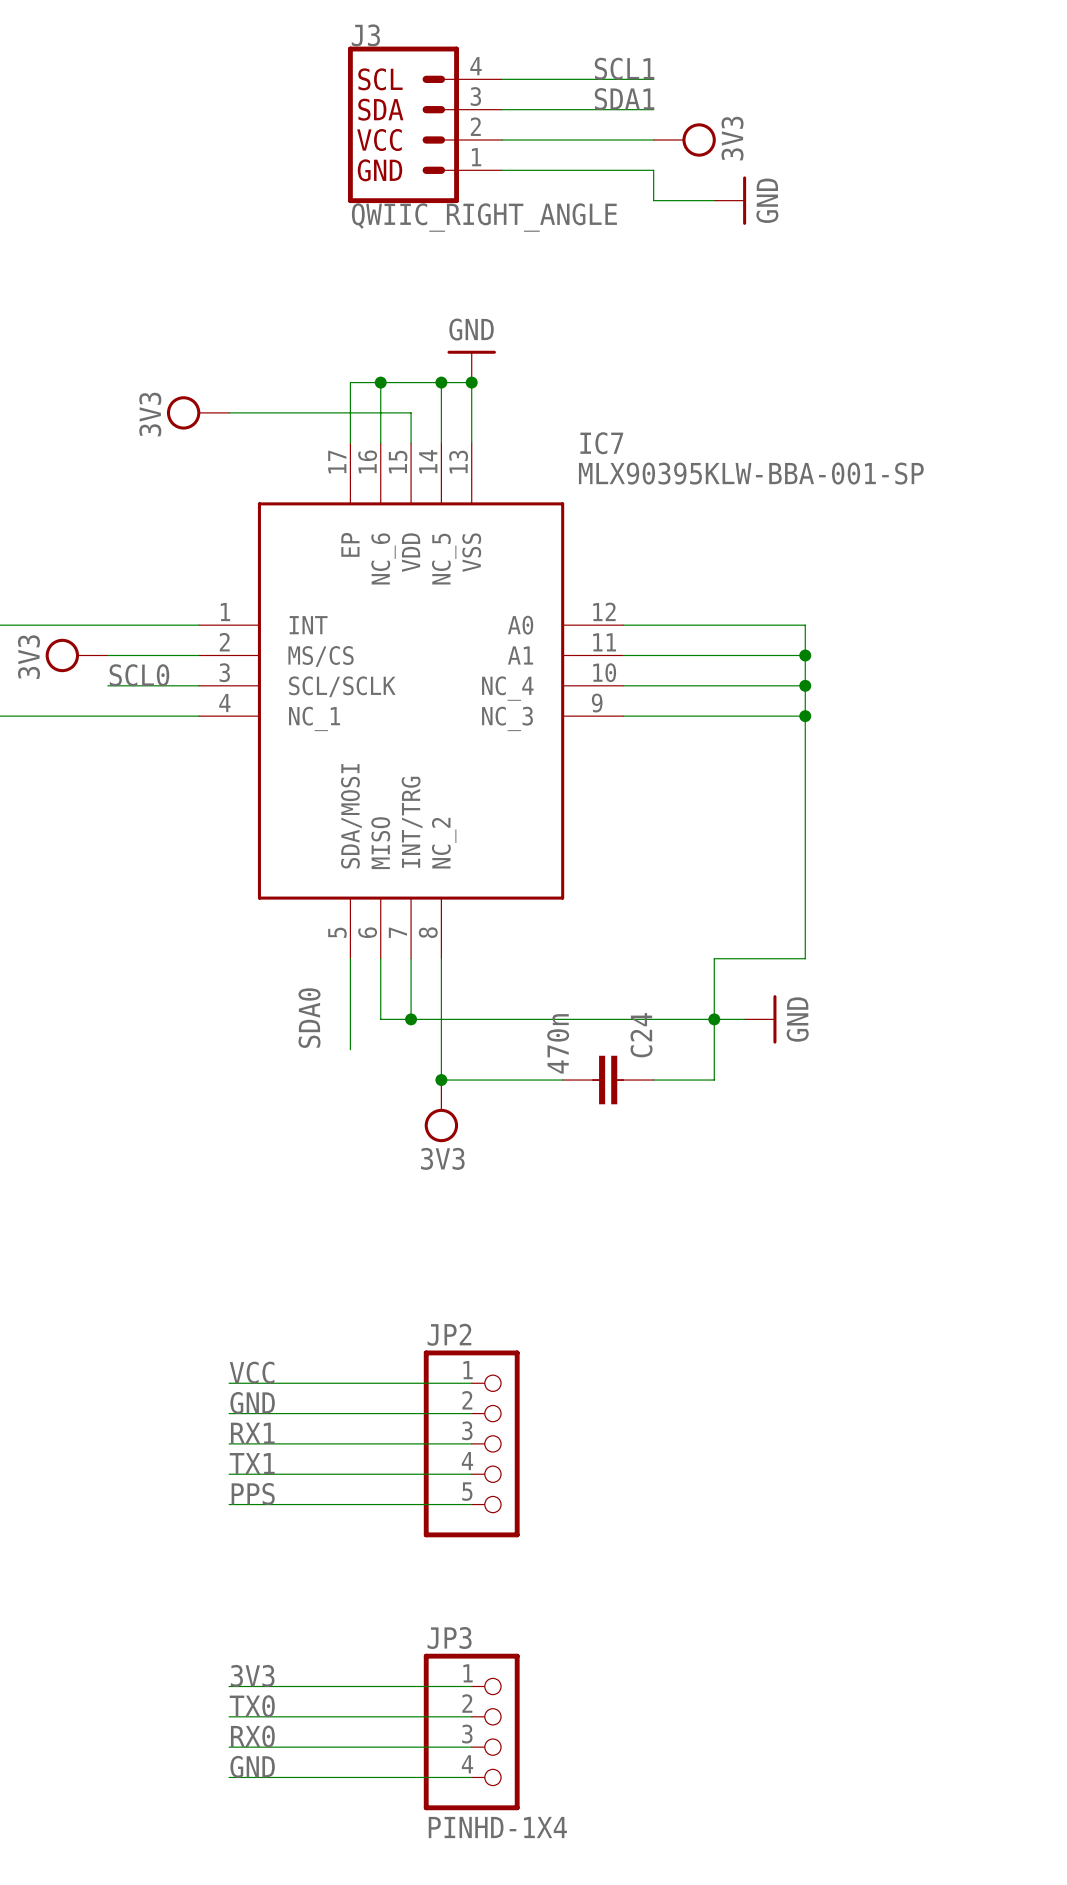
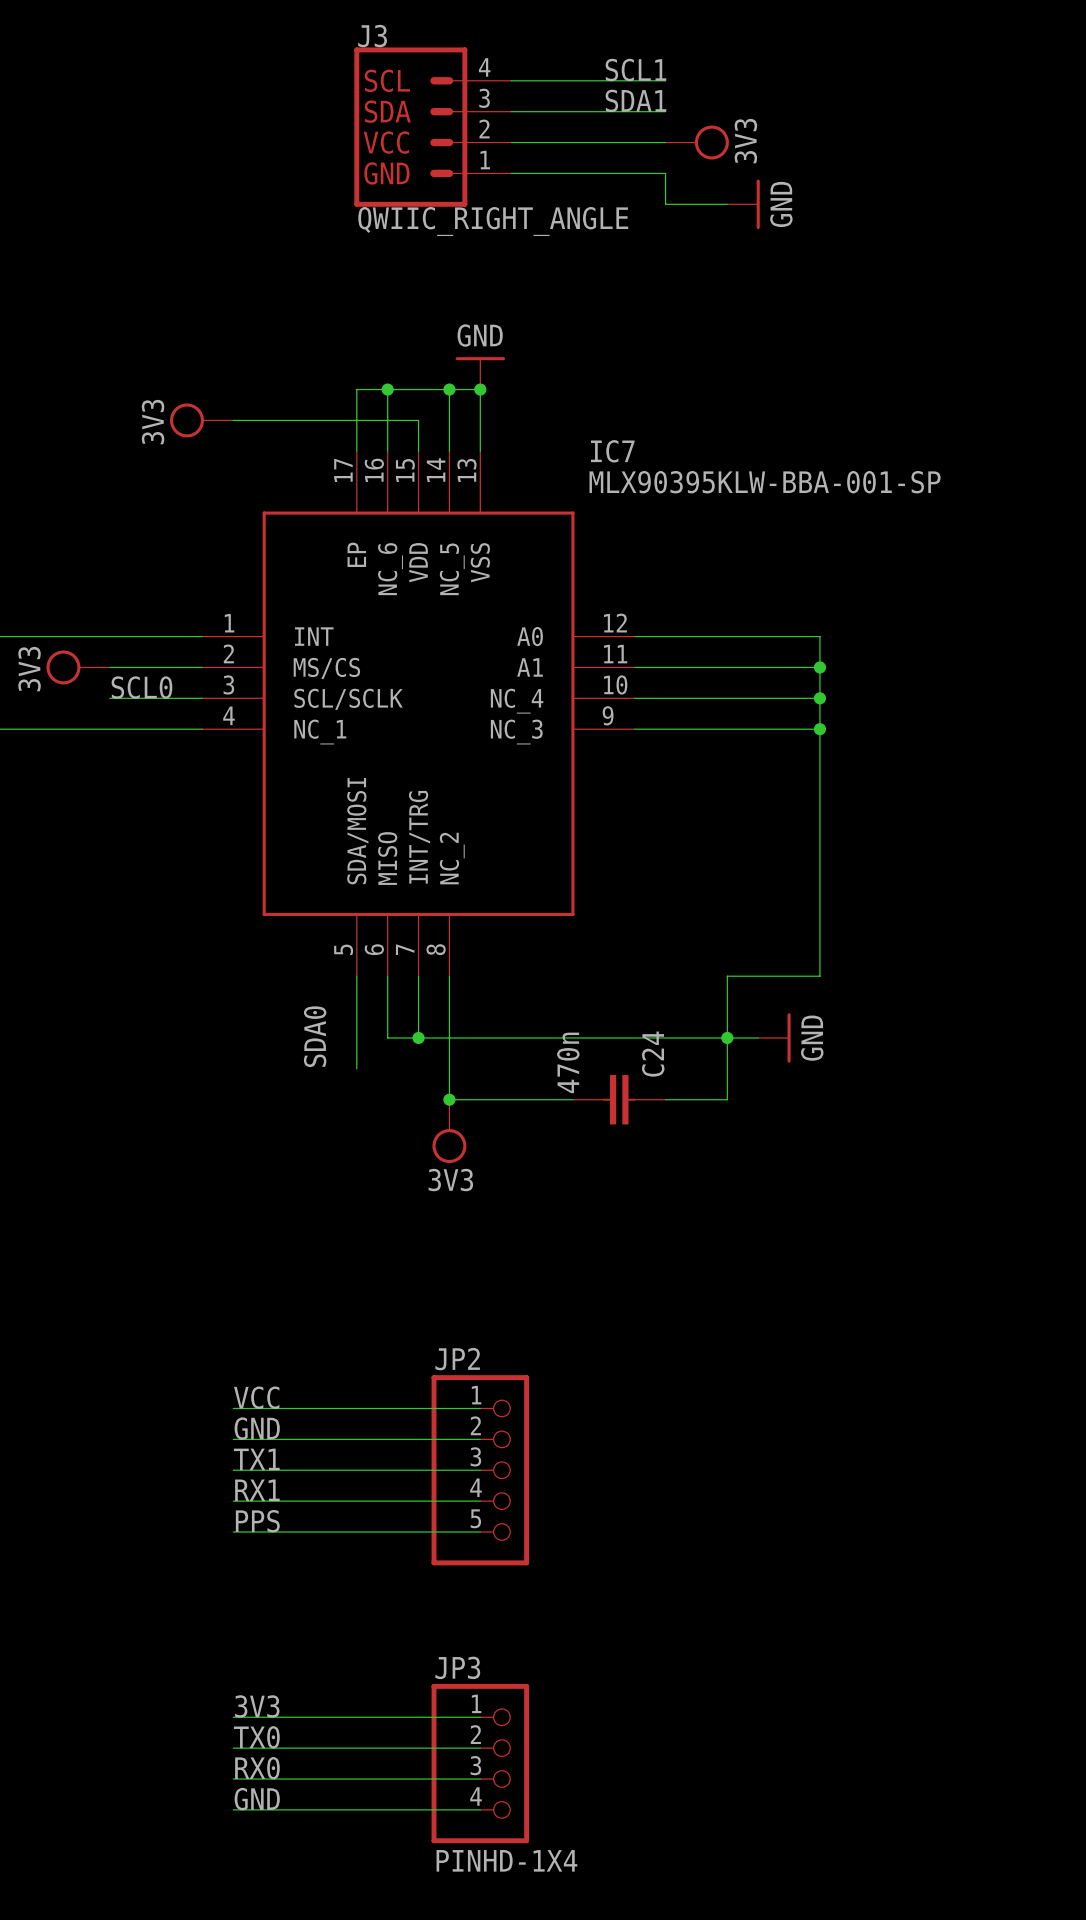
label: RX1 (252, 1433) -> TX1 (256, 1459)
label: TX1 (252, 1463) -> RX1 (257, 1490)

